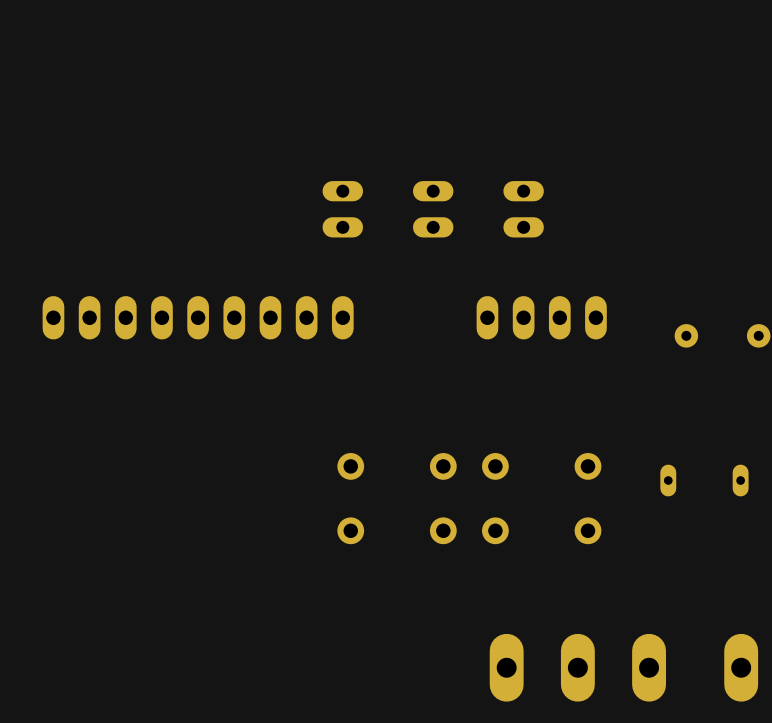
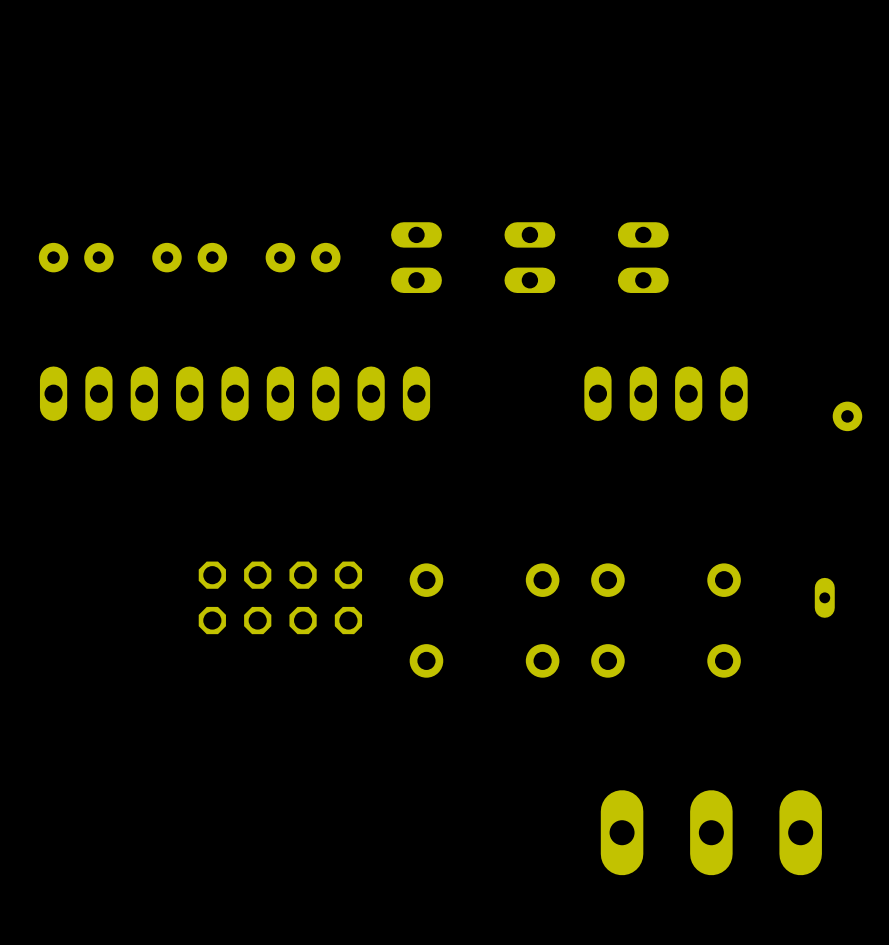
part: none -> (76, 257)
part: none -> (189, 257)
part: none -> (303, 257)
part: none -> (280, 597)

